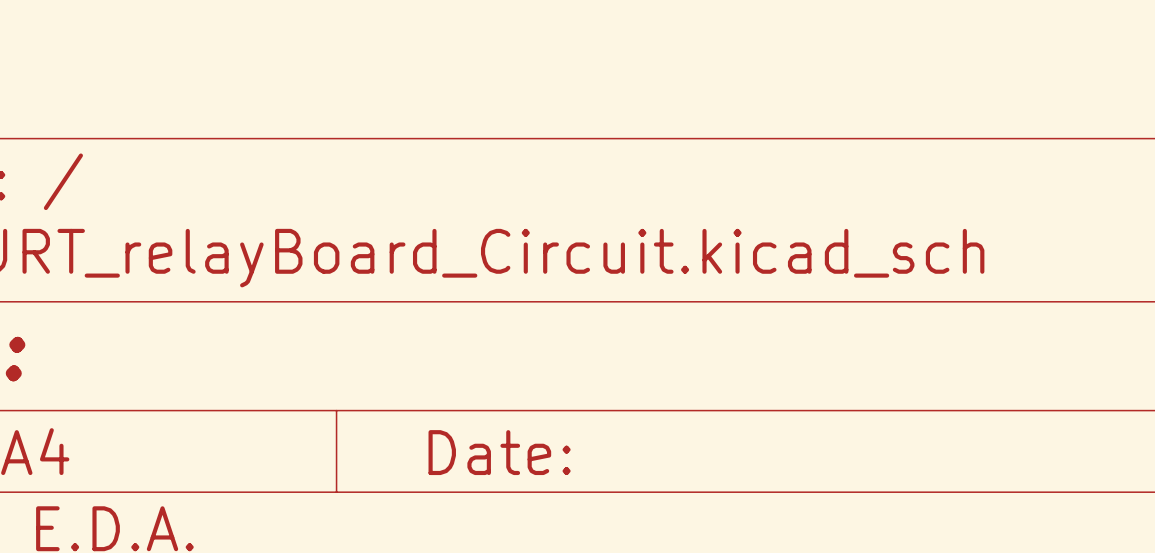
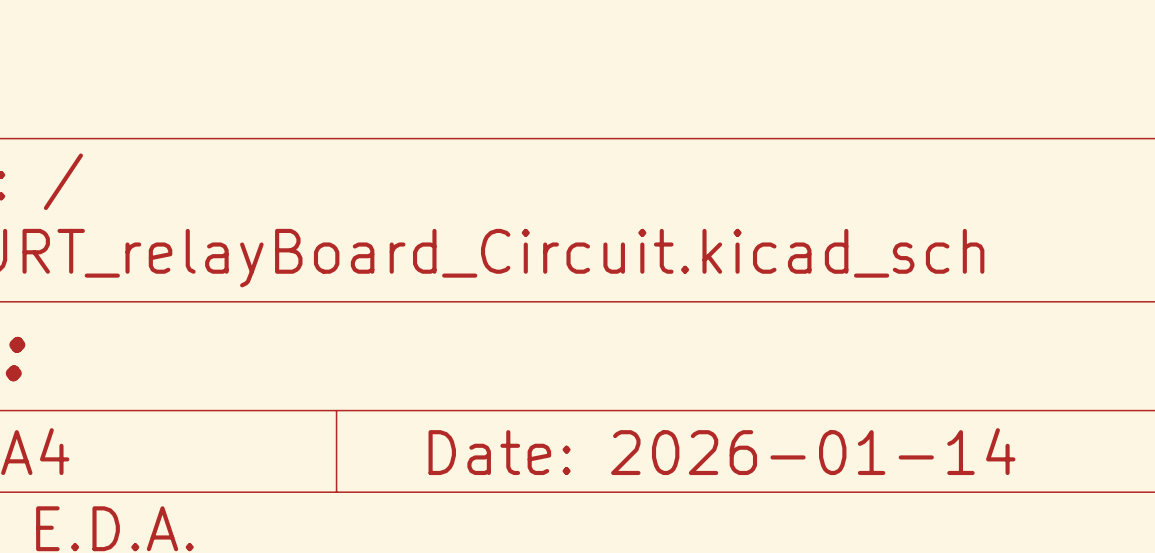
title block: Date: (499, 452) -> Date: 2026-01-14 (721, 451)

